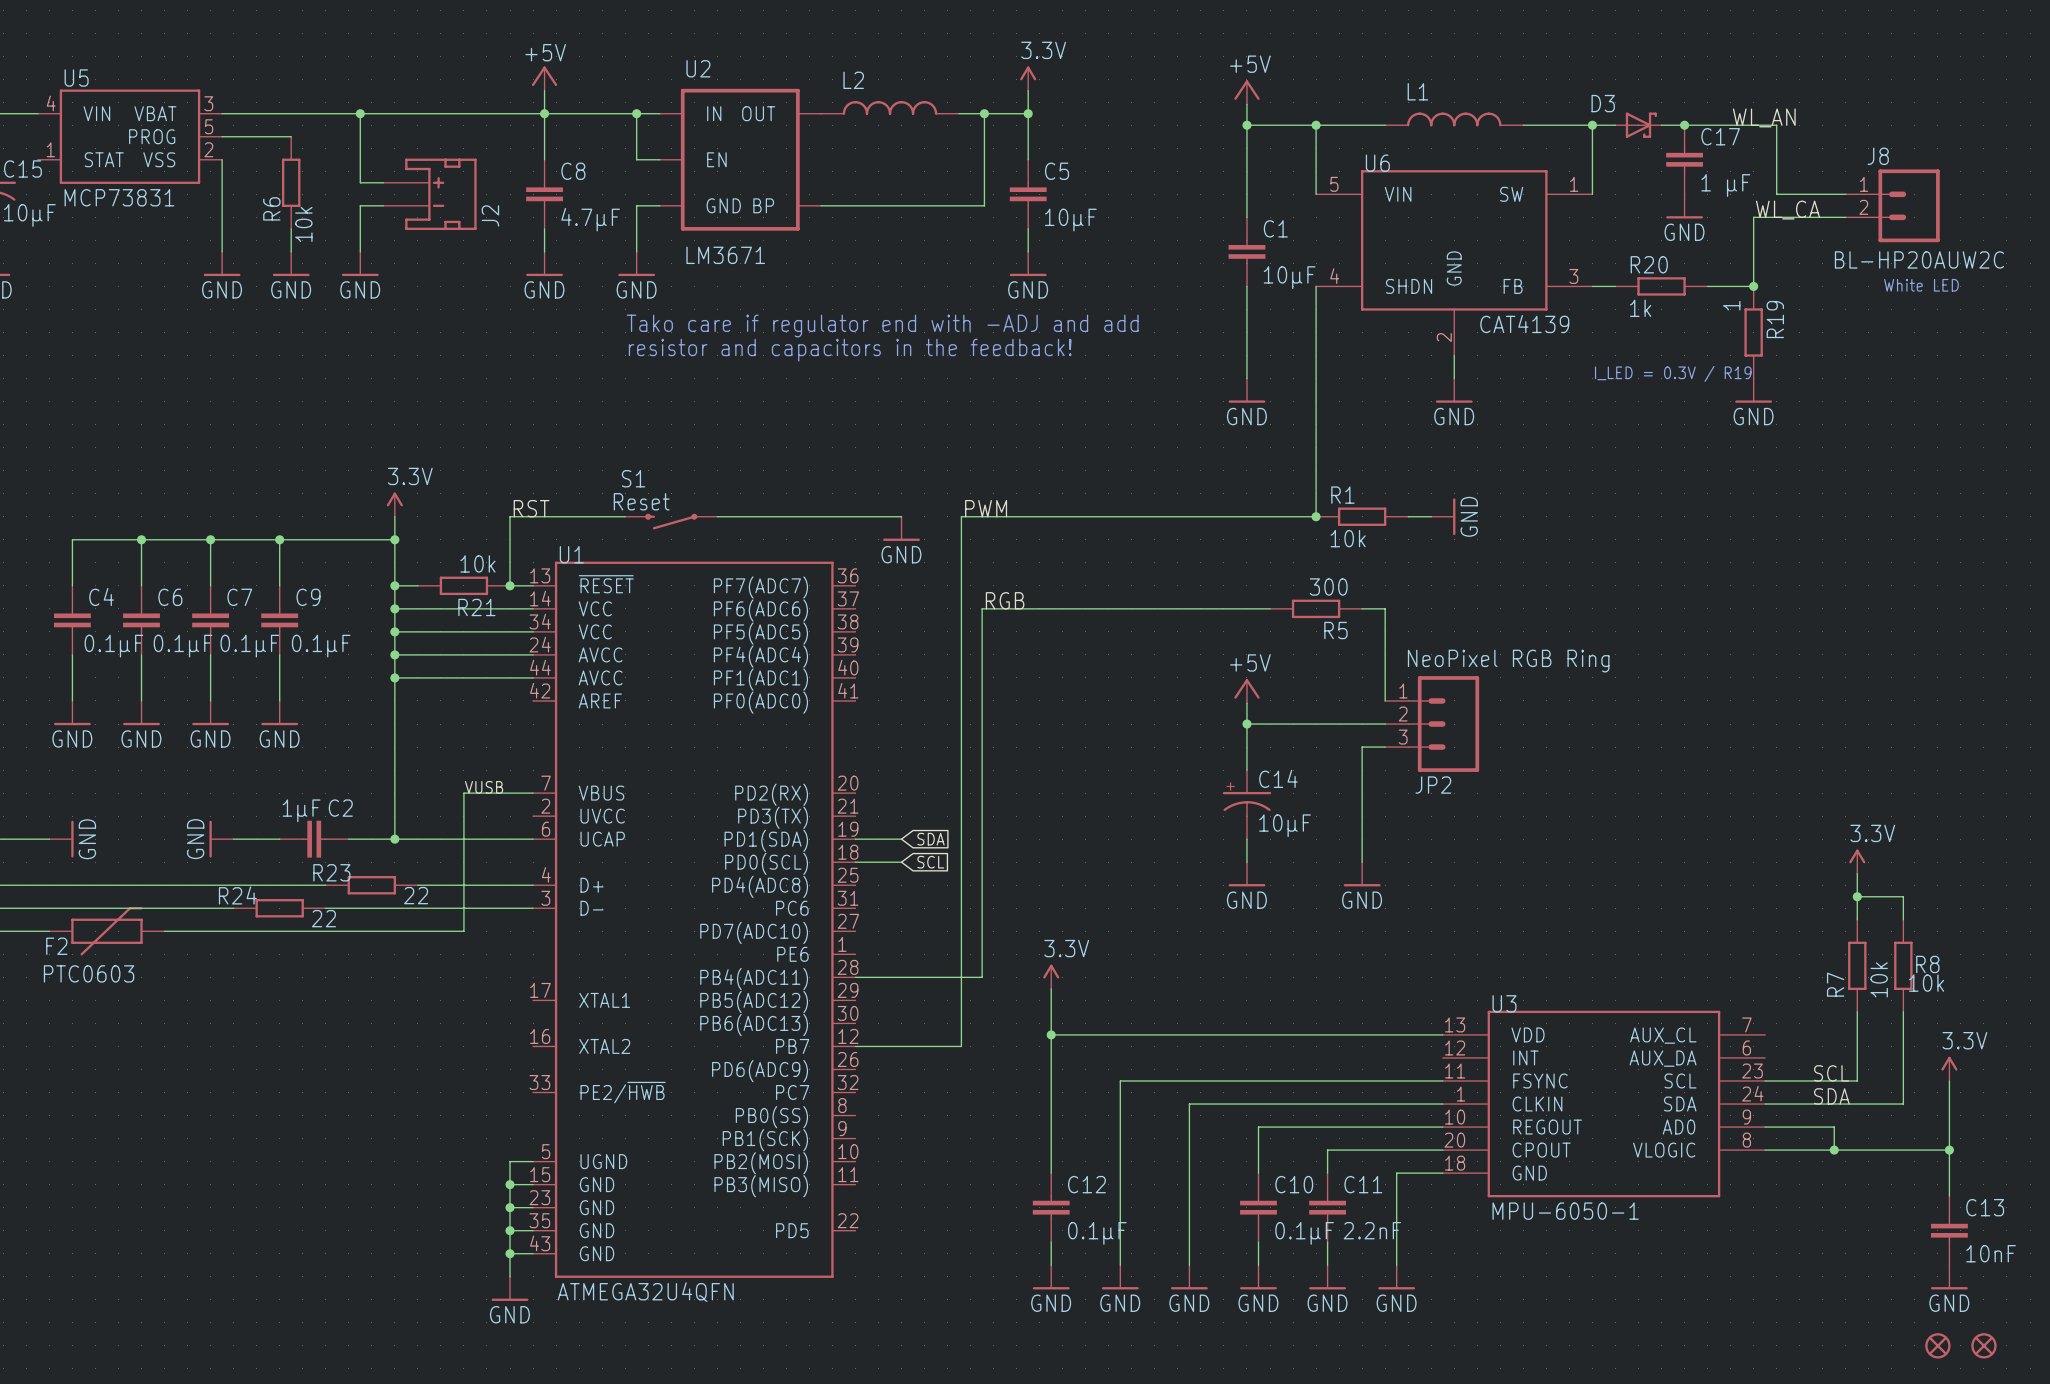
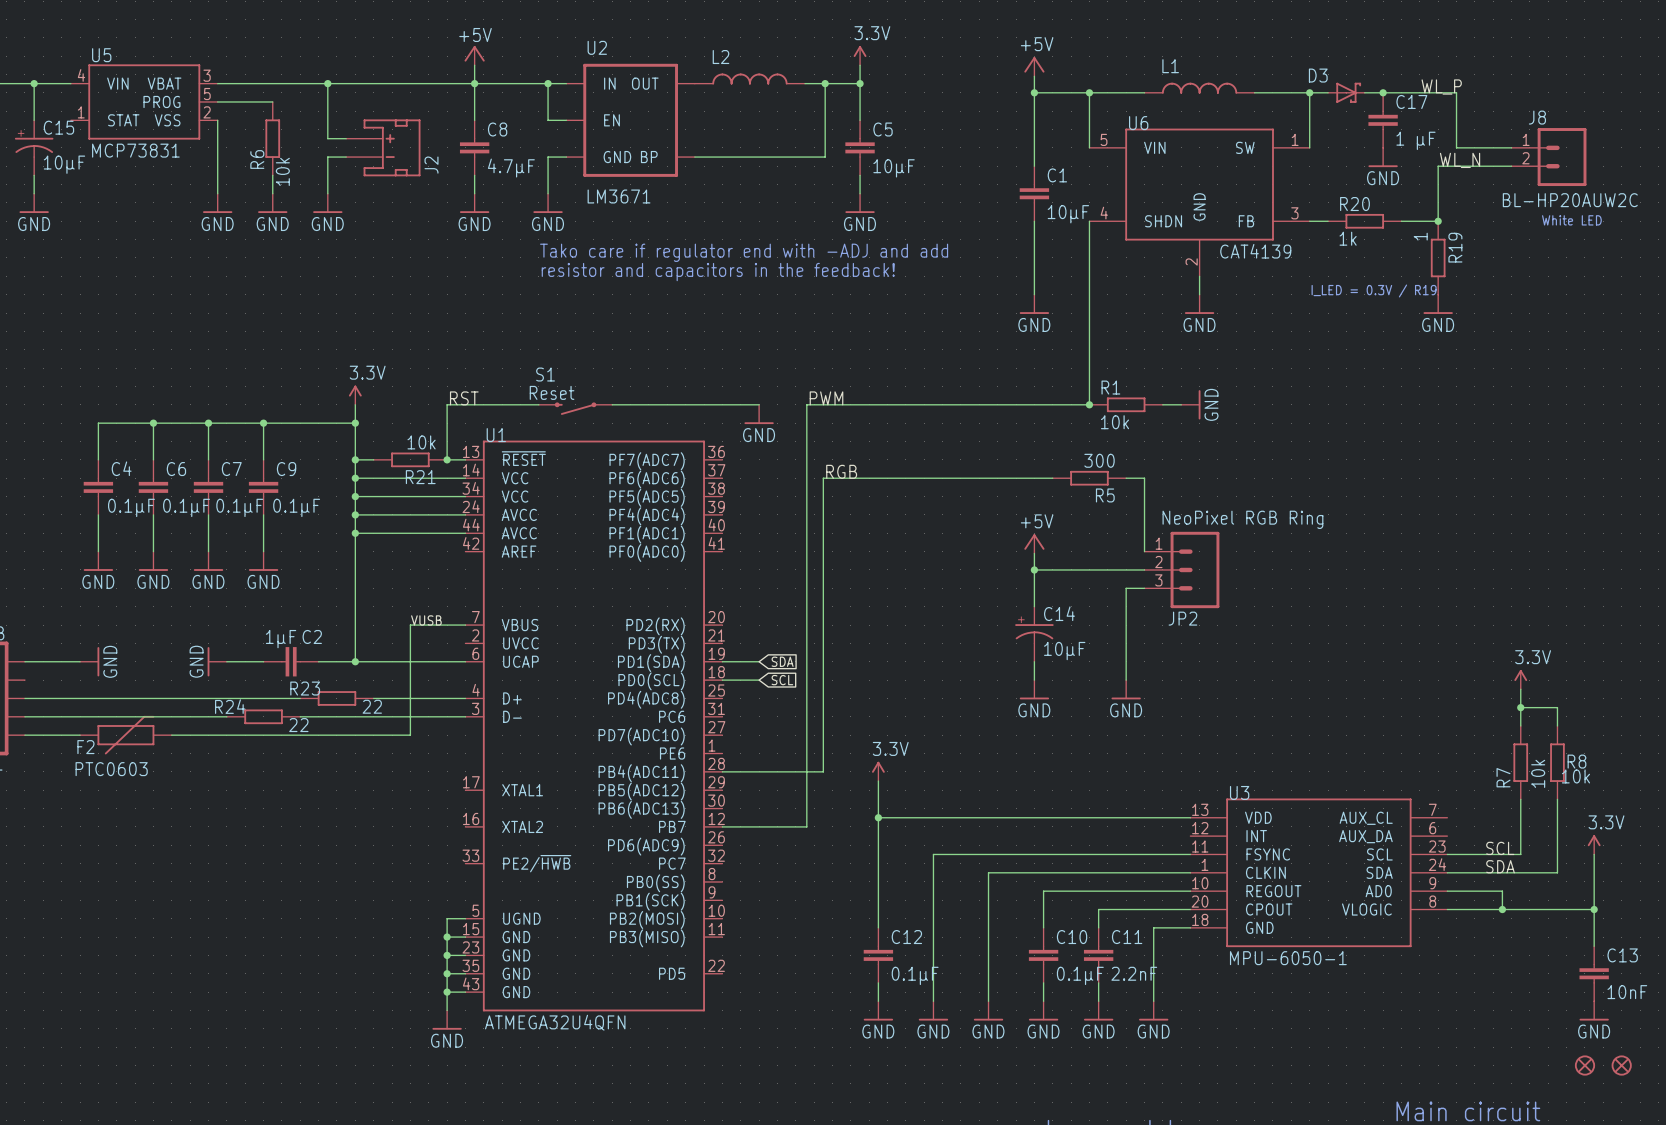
label: WL_AN (1764, 117) -> WL_P (1441, 86)
label: WL_CA (1788, 210) -> WL_N (1460, 160)

